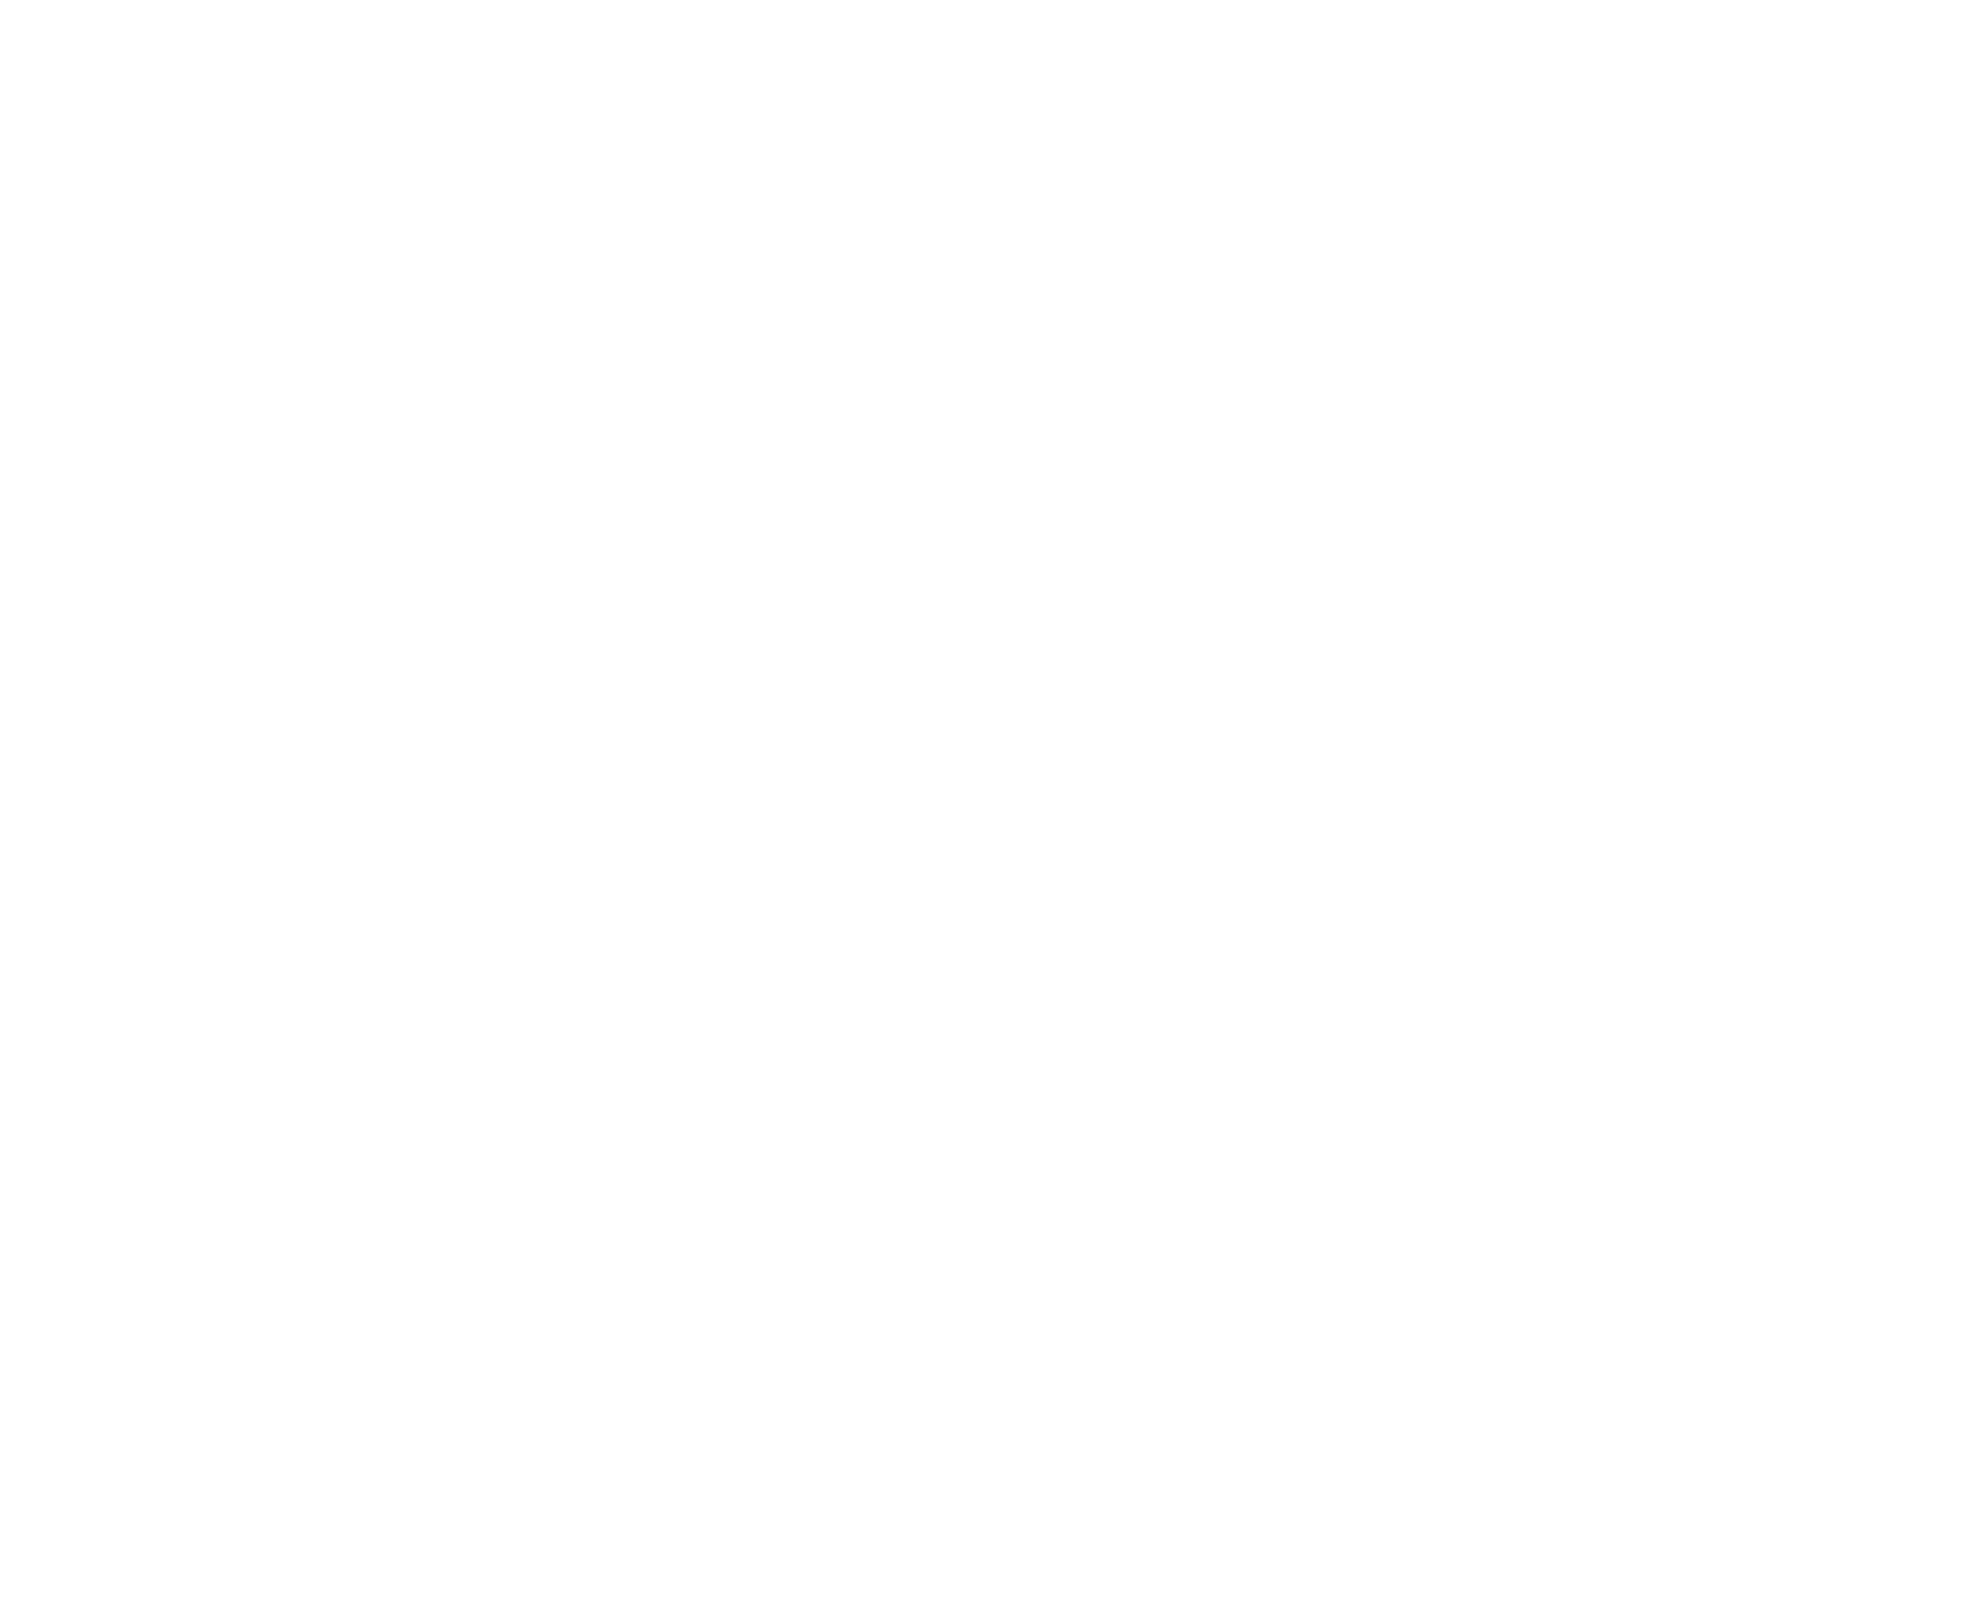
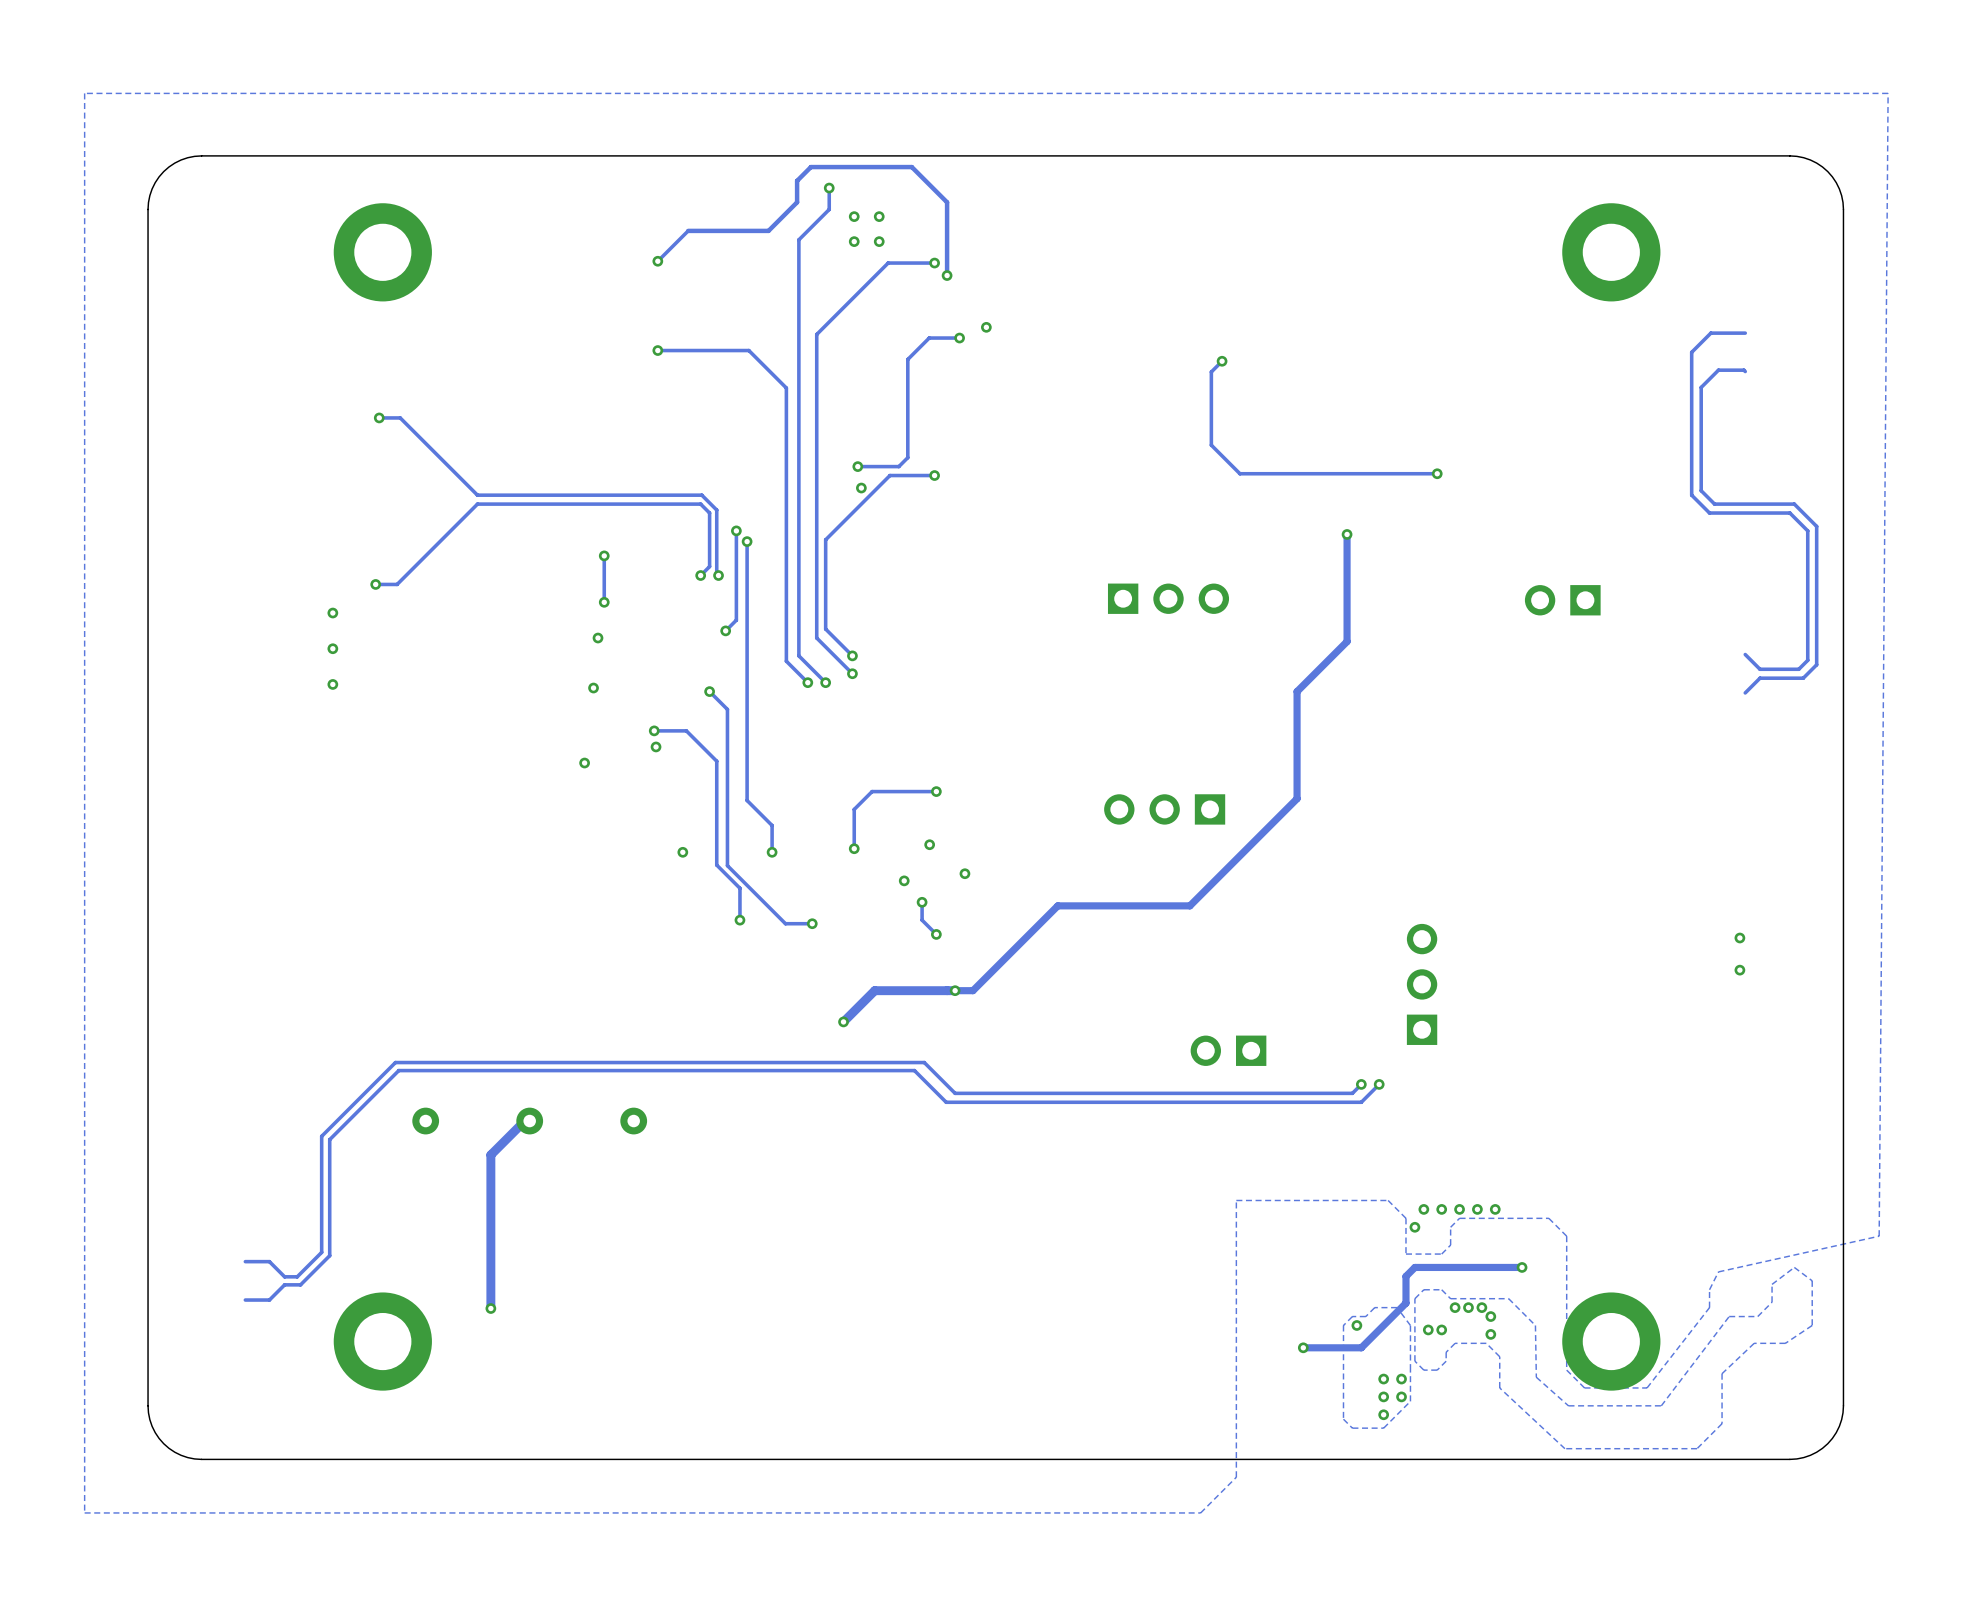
zone outline: none -> (1888, 93) (84, 93) (84, 1512) (1200, 1512) (1236, 1477) (1236, 1200) (1388, 1200) (1405, 1218) (1405, 1254) (1441, 1254) (1450, 1245) (1450, 1227) (1459, 1218) (1548, 1218) (1566, 1236) (1566, 1370) (1584, 1387) (1647, 1387) (1709, 1307) (1709, 1289) (1718, 1271) (1879, 1236) (1888, 93)
board edge: none -> (1789, 155) (201, 155) (181, 159) (168, 166) (159, 176) (152, 188) (148, 209) (148, 1405) (149, 1419) (159, 1438) (174, 1452) (187, 1457) (201, 1459) (1789, 1459) (1803, 1457) (1822, 1448) (1832, 1438) (1839, 1426) (1843, 1405) (1843, 209) (1839, 188) (1827, 171) (1810, 159) (1789, 155)
via: none -> (829, 188)
track: none -> (827, 189) (829, 188) (829, 209) (798, 239) (798, 655) (825, 682)
via: none -> (854, 216)
via: none -> (879, 216)
via: none -> (854, 241)
via: none -> (879, 241)
part: none -> (382, 252)
part: none -> (1611, 252)
track: none -> (657, 261) (688, 230) (768, 230) (797, 202) (797, 180) (810, 167) (911, 167) (947, 202) (947, 275)
via: none -> (657, 261)
track: none -> (934, 263) (888, 263) (816, 334) (816, 638) (852, 673)
via: none -> (934, 263)
via: none -> (947, 275)
via: none -> (986, 327)
track: none -> (1745, 333) (1710, 333) (1691, 352) (1691, 495) (1709, 513) (1789, 513) (1807, 530) (1807, 660) (1798, 669) (1759, 669) (1745, 654)
track: none -> (959, 338) (929, 338) (907, 359) (907, 457) (898, 466) (857, 466)
via: none -> (959, 338)
track: none -> (657, 350) (748, 350) (786, 388) (786, 661) (807, 682)
via: none -> (657, 350)
track: none -> (1222, 361) (1211, 371) (1211, 445) (1239, 473) (1437, 473)
via: none -> (1222, 361)
track: none -> (1745, 371) (1718, 370) (1701, 387) (1701, 490) (1714, 504) (1794, 504) (1816, 526) (1816, 664) (1803, 678) (1759, 678) (1745, 692)
track: none -> (379, 417) (400, 417) (477, 495) (701, 495) (716, 510) (716, 577) (718, 575)
via: none -> (379, 417)
via: none -> (857, 466)
via: none -> (1437, 473)
track: none -> (934, 475) (889, 475) (825, 539) (825, 629) (852, 655)
via: none -> (934, 475)
via: none -> (861, 488)
track: none -> (736, 530) (736, 620) (725, 630)
via: none -> (736, 530)
track: none -> (1347, 534) (1347, 641) (1297, 691) (1297, 798) (1189, 905) (1057, 905) (972, 990) (874, 990) (843, 1021)
via: none -> (1347, 534)
track: none -> (747, 541) (747, 800) (772, 825) (772, 852)
via: none -> (747, 541)
track: none -> (604, 555) (604, 602)
via: none -> (604, 555)
track: none -> (700, 575) (709, 566) (709, 513) (700, 504) (477, 504) (397, 584) (375, 584)
via: none -> (700, 575)
via: none -> (718, 575)
via: none -> (375, 584)
part: none -> (1168, 598)
part: none -> (1562, 600)
via: none -> (604, 602)
via: none -> (332, 613)
via: none -> (725, 630)
via: none -> (598, 638)
via: none -> (332, 648)
via: none -> (852, 655)
via: none -> (852, 673)
via: none -> (807, 682)
via: none -> (825, 682)
via: none -> (332, 684)
via: none -> (593, 688)
track: none -> (709, 691) (727, 709) (727, 865) (785, 923) (812, 923)
via: none -> (709, 691)
track: none -> (654, 730) (686, 730) (716, 761) (716, 865) (739, 888) (739, 920)
via: none -> (654, 730)
via: none -> (656, 746)
via: none -> (584, 763)
track: none -> (936, 791) (872, 791) (854, 809) (854, 848)
via: none -> (936, 791)
part: none -> (1164, 809)
via: none -> (929, 844)
via: none -> (854, 848)
via: none -> (682, 852)
via: none -> (772, 852)
via: none -> (964, 873)
via: none -> (904, 880)
track: none -> (922, 902) (922, 920) (936, 934)
via: none -> (922, 902)
via: none -> (739, 920)
via: none -> (812, 923)
via: none -> (936, 934)
via: none -> (1739, 938)
via: none -> (1739, 970)
part: none -> (1422, 984)
via: none -> (955, 990)
via: none -> (843, 1021)
part: none -> (1228, 1050)
track: none -> (1361, 1084) (1352, 1093) (955, 1093) (924, 1062) (395, 1062) (321, 1136) (321, 1252) (297, 1276) (284, 1276) (269, 1261) (245, 1261)
via: none -> (1361, 1084)
track: none -> (1379, 1084) (1361, 1102) (946, 1102) (914, 1070) (398, 1070) (329, 1139) (329, 1255) (300, 1284) (284, 1284) (269, 1300) (245, 1300)
via: none -> (1379, 1084)
part: none -> (425, 1121)
track: none -> (524, 1121) (490, 1154) (490, 1308)
part: none -> (529, 1121)
part: none -> (633, 1121)
via: none -> (1423, 1209)
via: none -> (1441, 1209)
via: none -> (1459, 1209)
via: none -> (1477, 1209)
via: none -> (1495, 1209)
via: none -> (1414, 1227)
track: none -> (1522, 1267) (1414, 1267) (1405, 1276) (1405, 1303) (1361, 1347) (1303, 1347)
via: none -> (1522, 1267)
zone outline: none -> (1794, 1267) (1772, 1284) (1772, 1302) (1757, 1316) (1729, 1316) (1661, 1405) (1568, 1405) (1536, 1377) (1535, 1325) (1508, 1298) (1450, 1298) (1441, 1289) (1423, 1289) (1414, 1298) (1414, 1361) (1423, 1370) (1437, 1370) (1446, 1361) (1446, 1352) (1455, 1343) (1486, 1343) (1499, 1356) (1499, 1387) (1564, 1448) (1697, 1448) (1722, 1423) (1722, 1373) (1754, 1343) (1785, 1343) (1812, 1325) (1812, 1280) (1794, 1267)
zone outline: none -> (1397, 1307) (1410, 1325) (1410, 1401) (1383, 1428) (1352, 1428) (1343, 1419) (1343, 1325) (1352, 1316) (1365, 1316) (1374, 1307) (1397, 1307)
via: none -> (1455, 1307)
via: none -> (1468, 1307)
via: none -> (1481, 1307)
via: none -> (490, 1308)
via: none -> (1490, 1316)
via: none -> (1356, 1325)
via: none -> (1428, 1329)
via: none -> (1441, 1329)
via: none -> (1490, 1334)
part: none -> (382, 1341)
part: none -> (1611, 1341)
via: none -> (1303, 1347)
via: none -> (1383, 1379)
via: none -> (1401, 1379)
via: none -> (1383, 1396)
via: none -> (1401, 1396)
via: none -> (1383, 1414)

